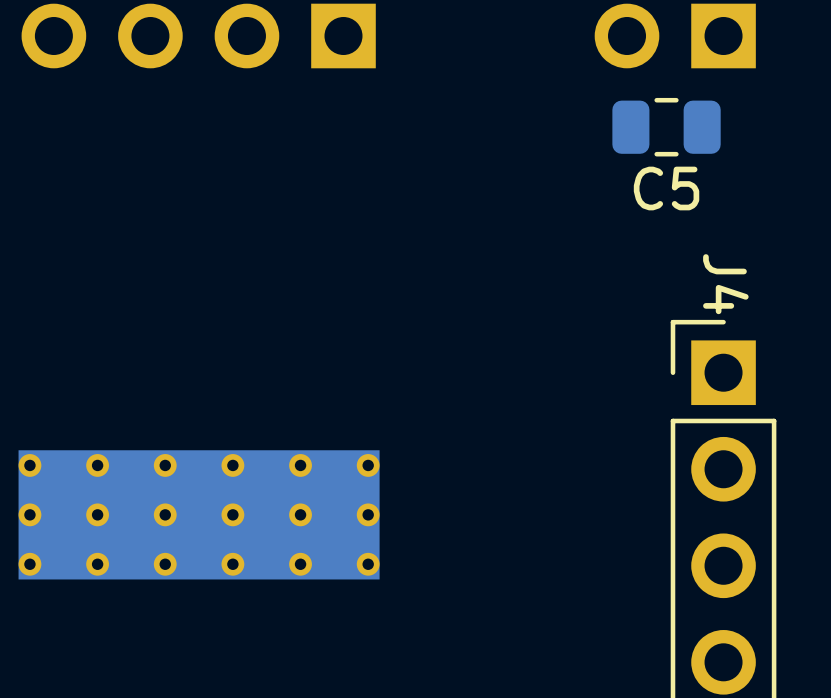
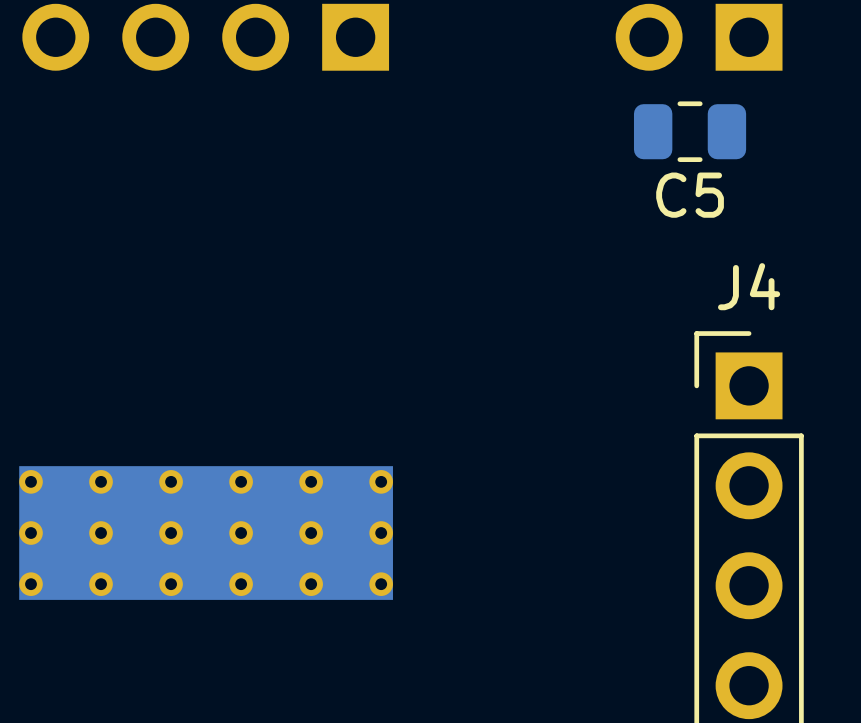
J4 name rotation: 0° (725, 284) -> 90° counterclockwise (749, 286)

